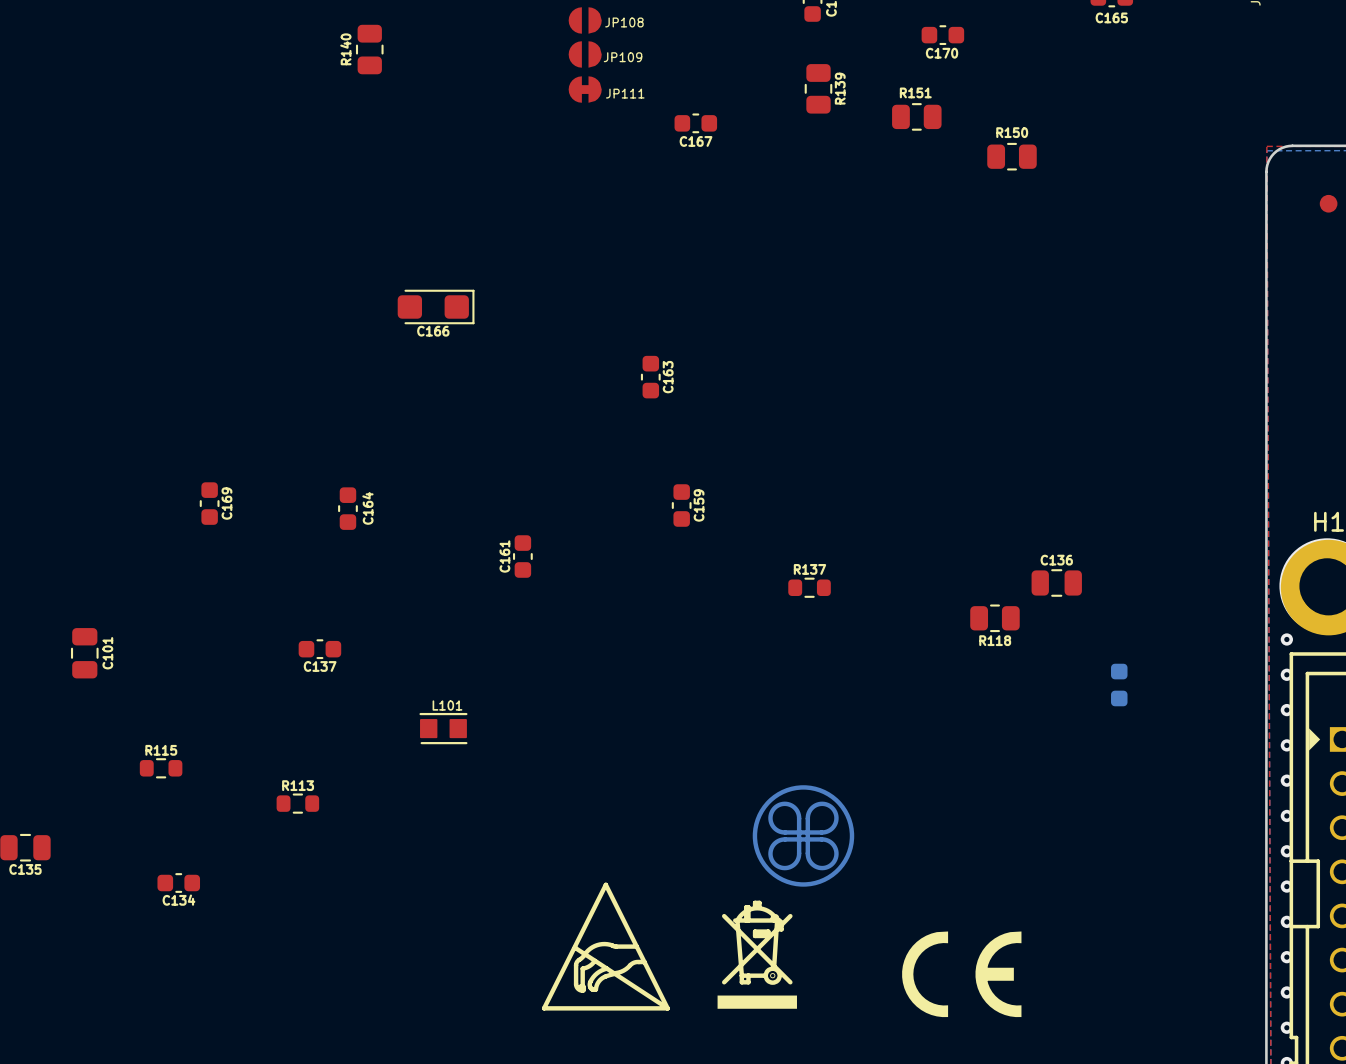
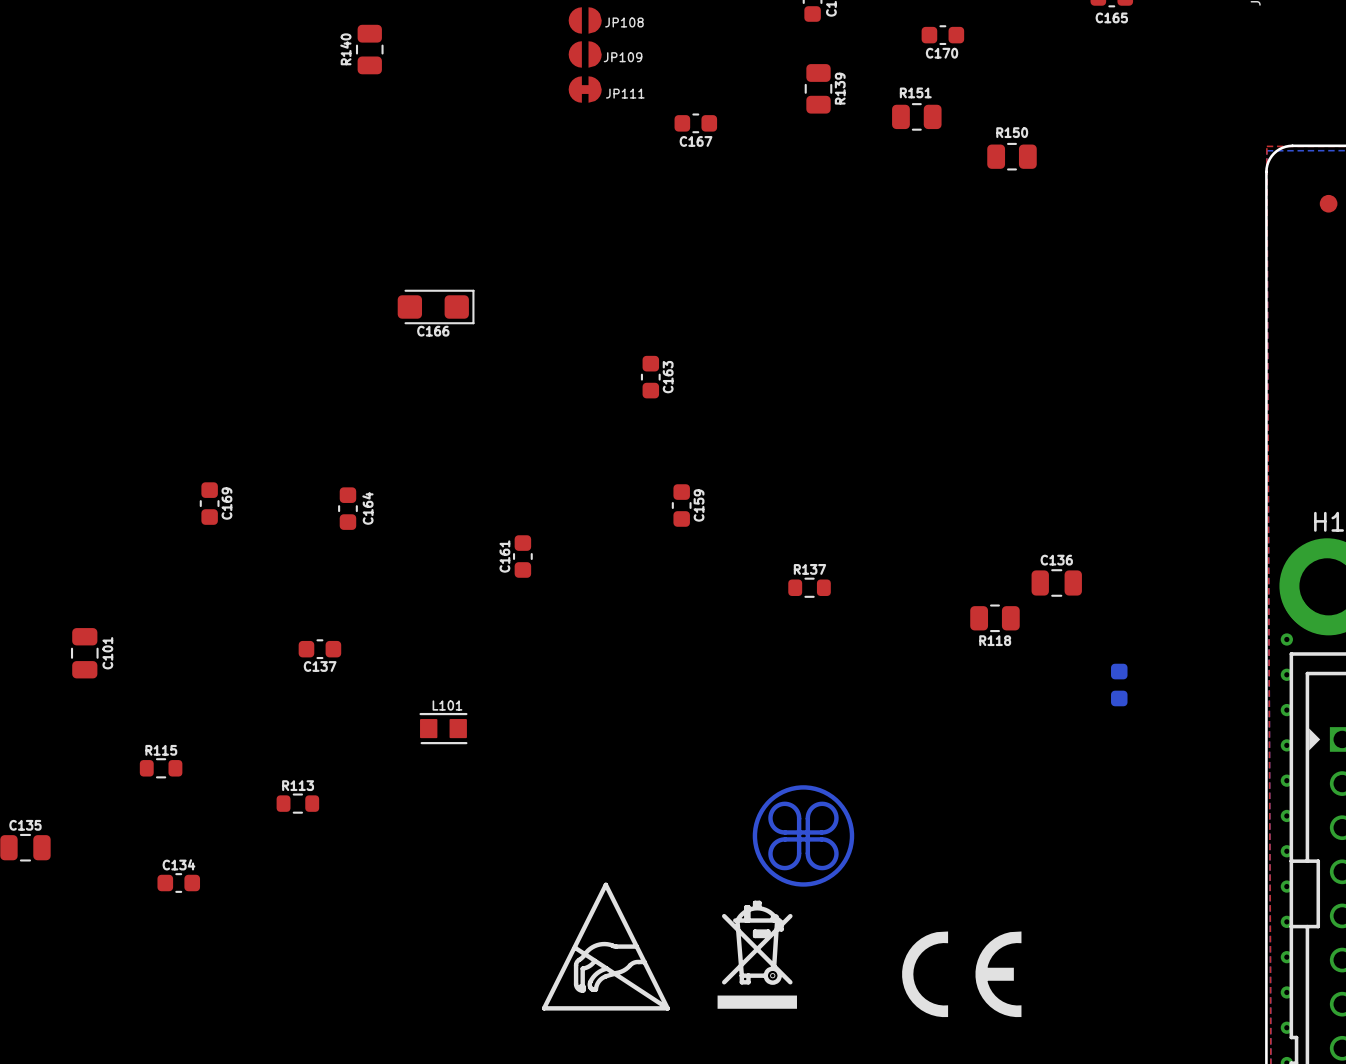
C135 name position: C135 (25, 869) -> C135 (25, 825)
C134 name position: C134 (178, 900) -> C134 (178, 864)

